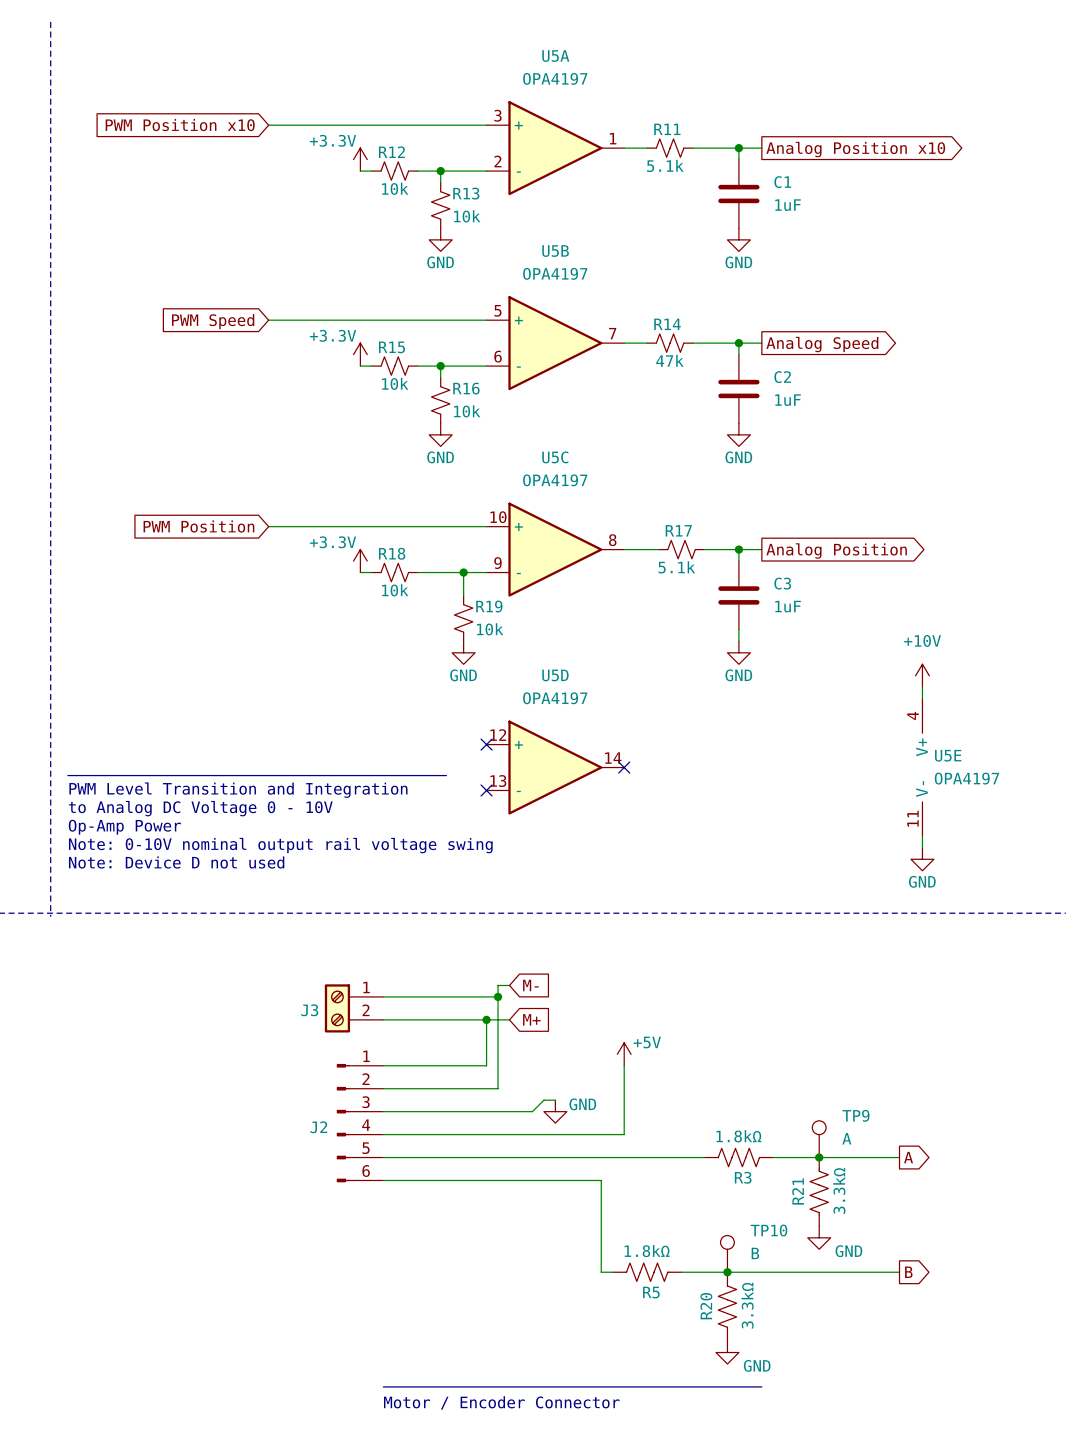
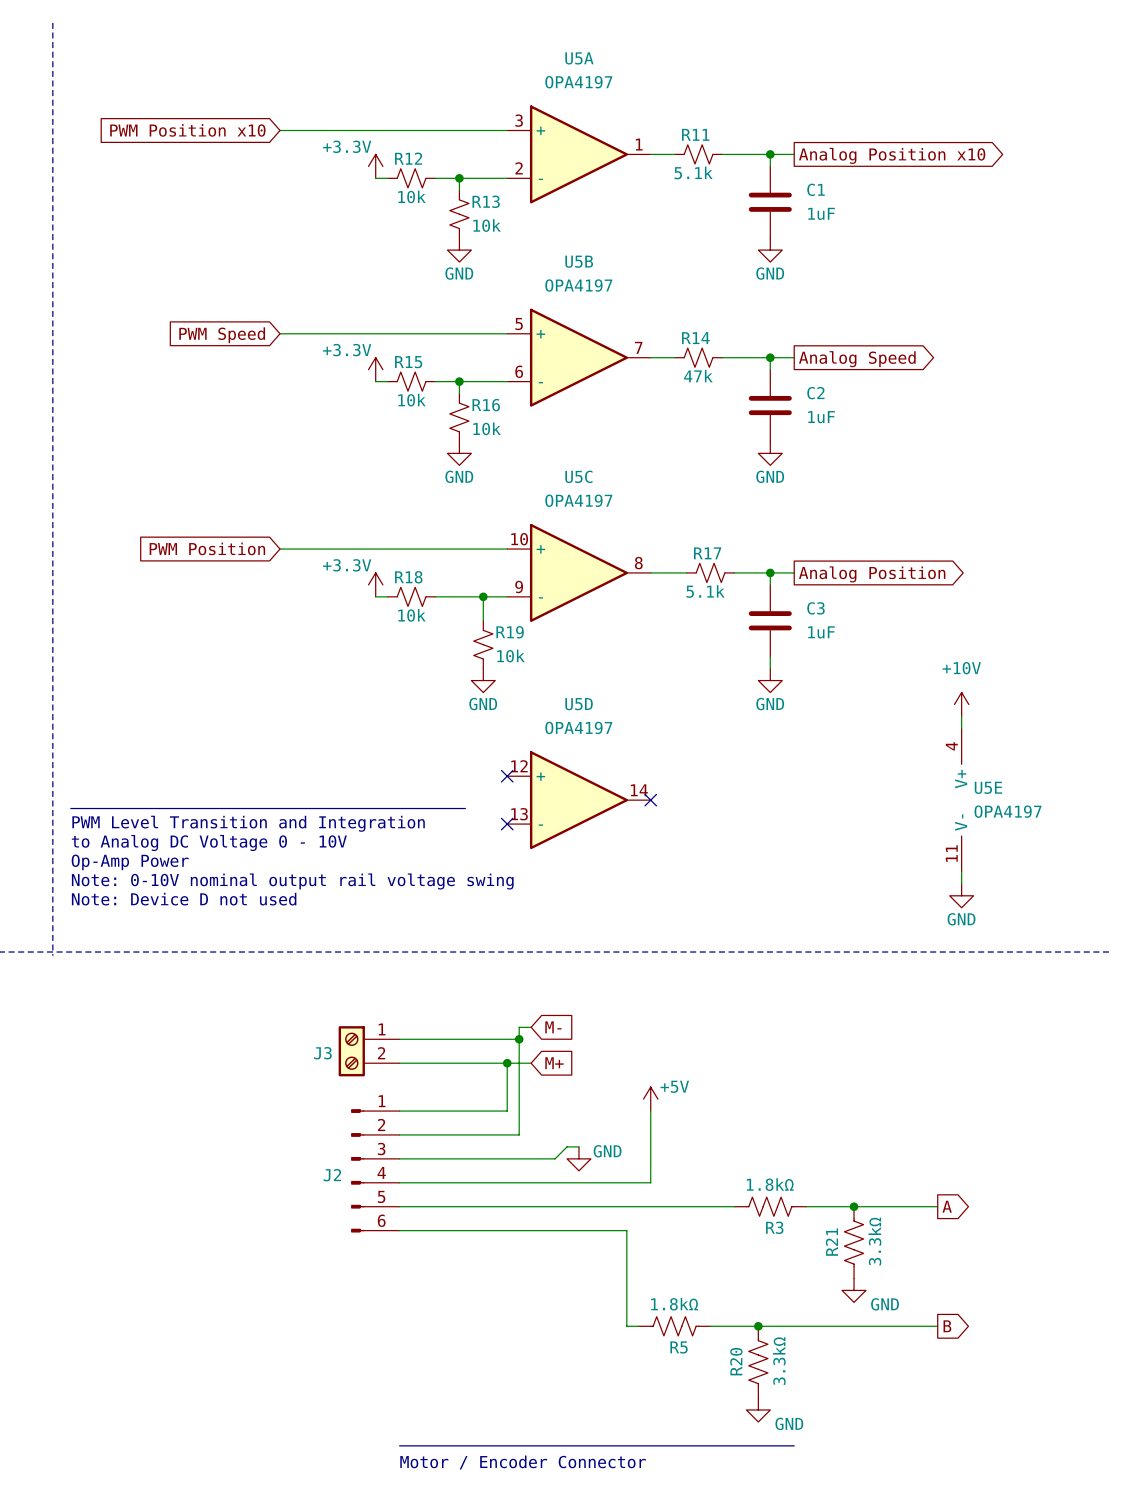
TP9: A (819, 1139) -> none
TP10: B (727, 1253) -> none

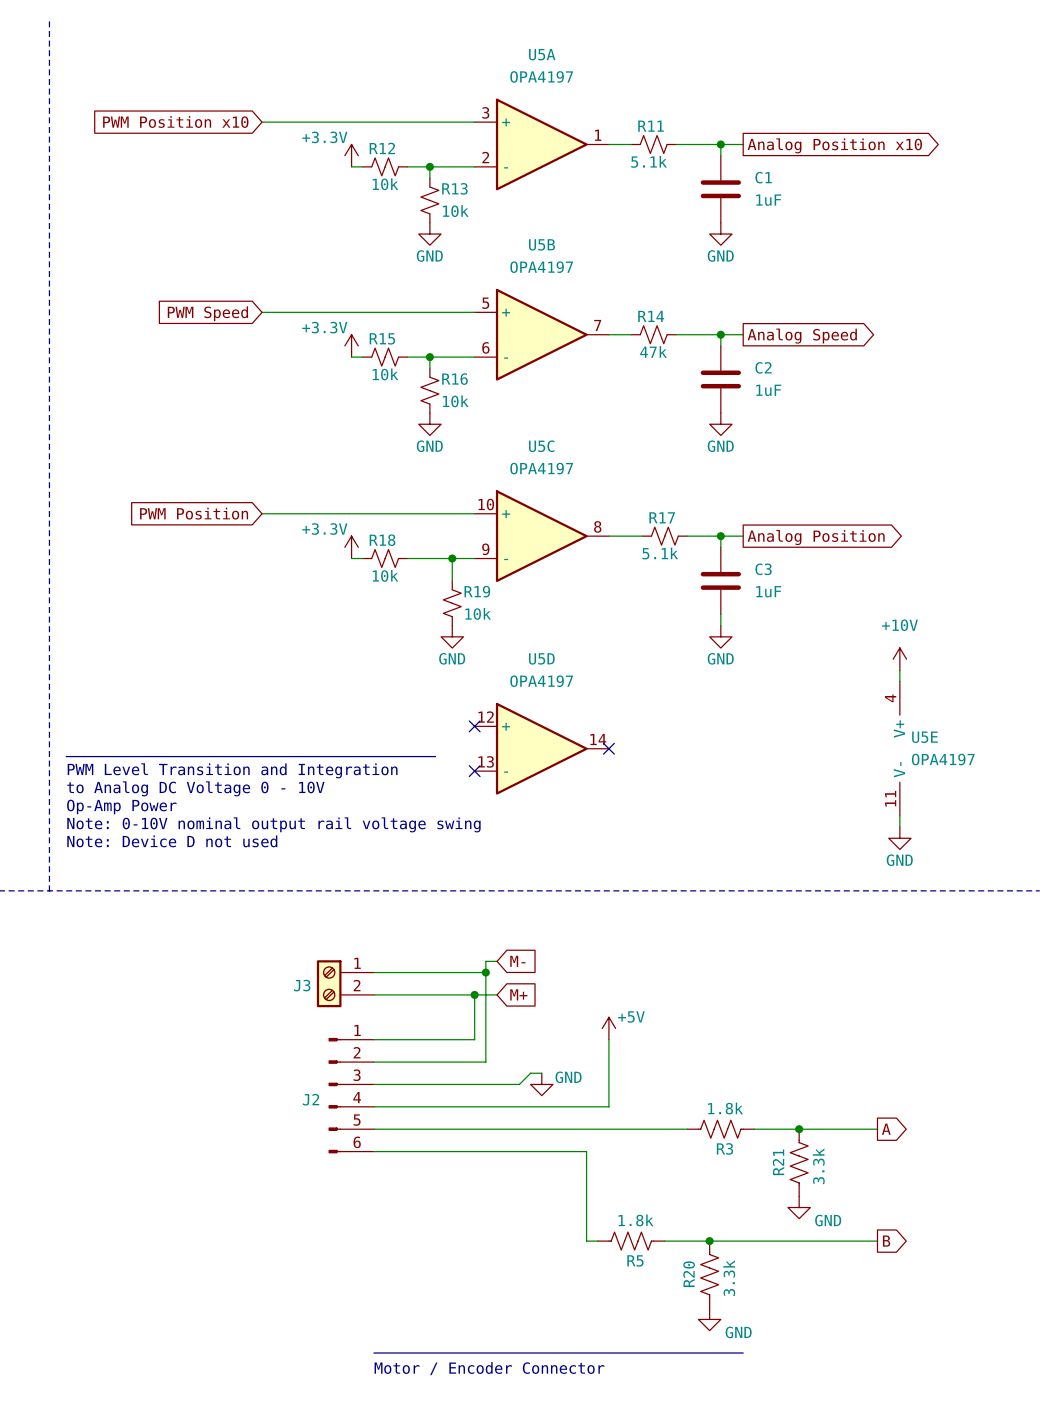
R3 value: 1.8kΩ (770, 1184) -> 1.8k (725, 1108)
R21 value: 3.3kΩ (874, 1241) -> 3.3k (818, 1166)
R5 value: 1.8kΩ (674, 1304) -> 1.8k (636, 1220)
R20 value: 3.3kΩ (779, 1361) -> 3.3k (729, 1278)

